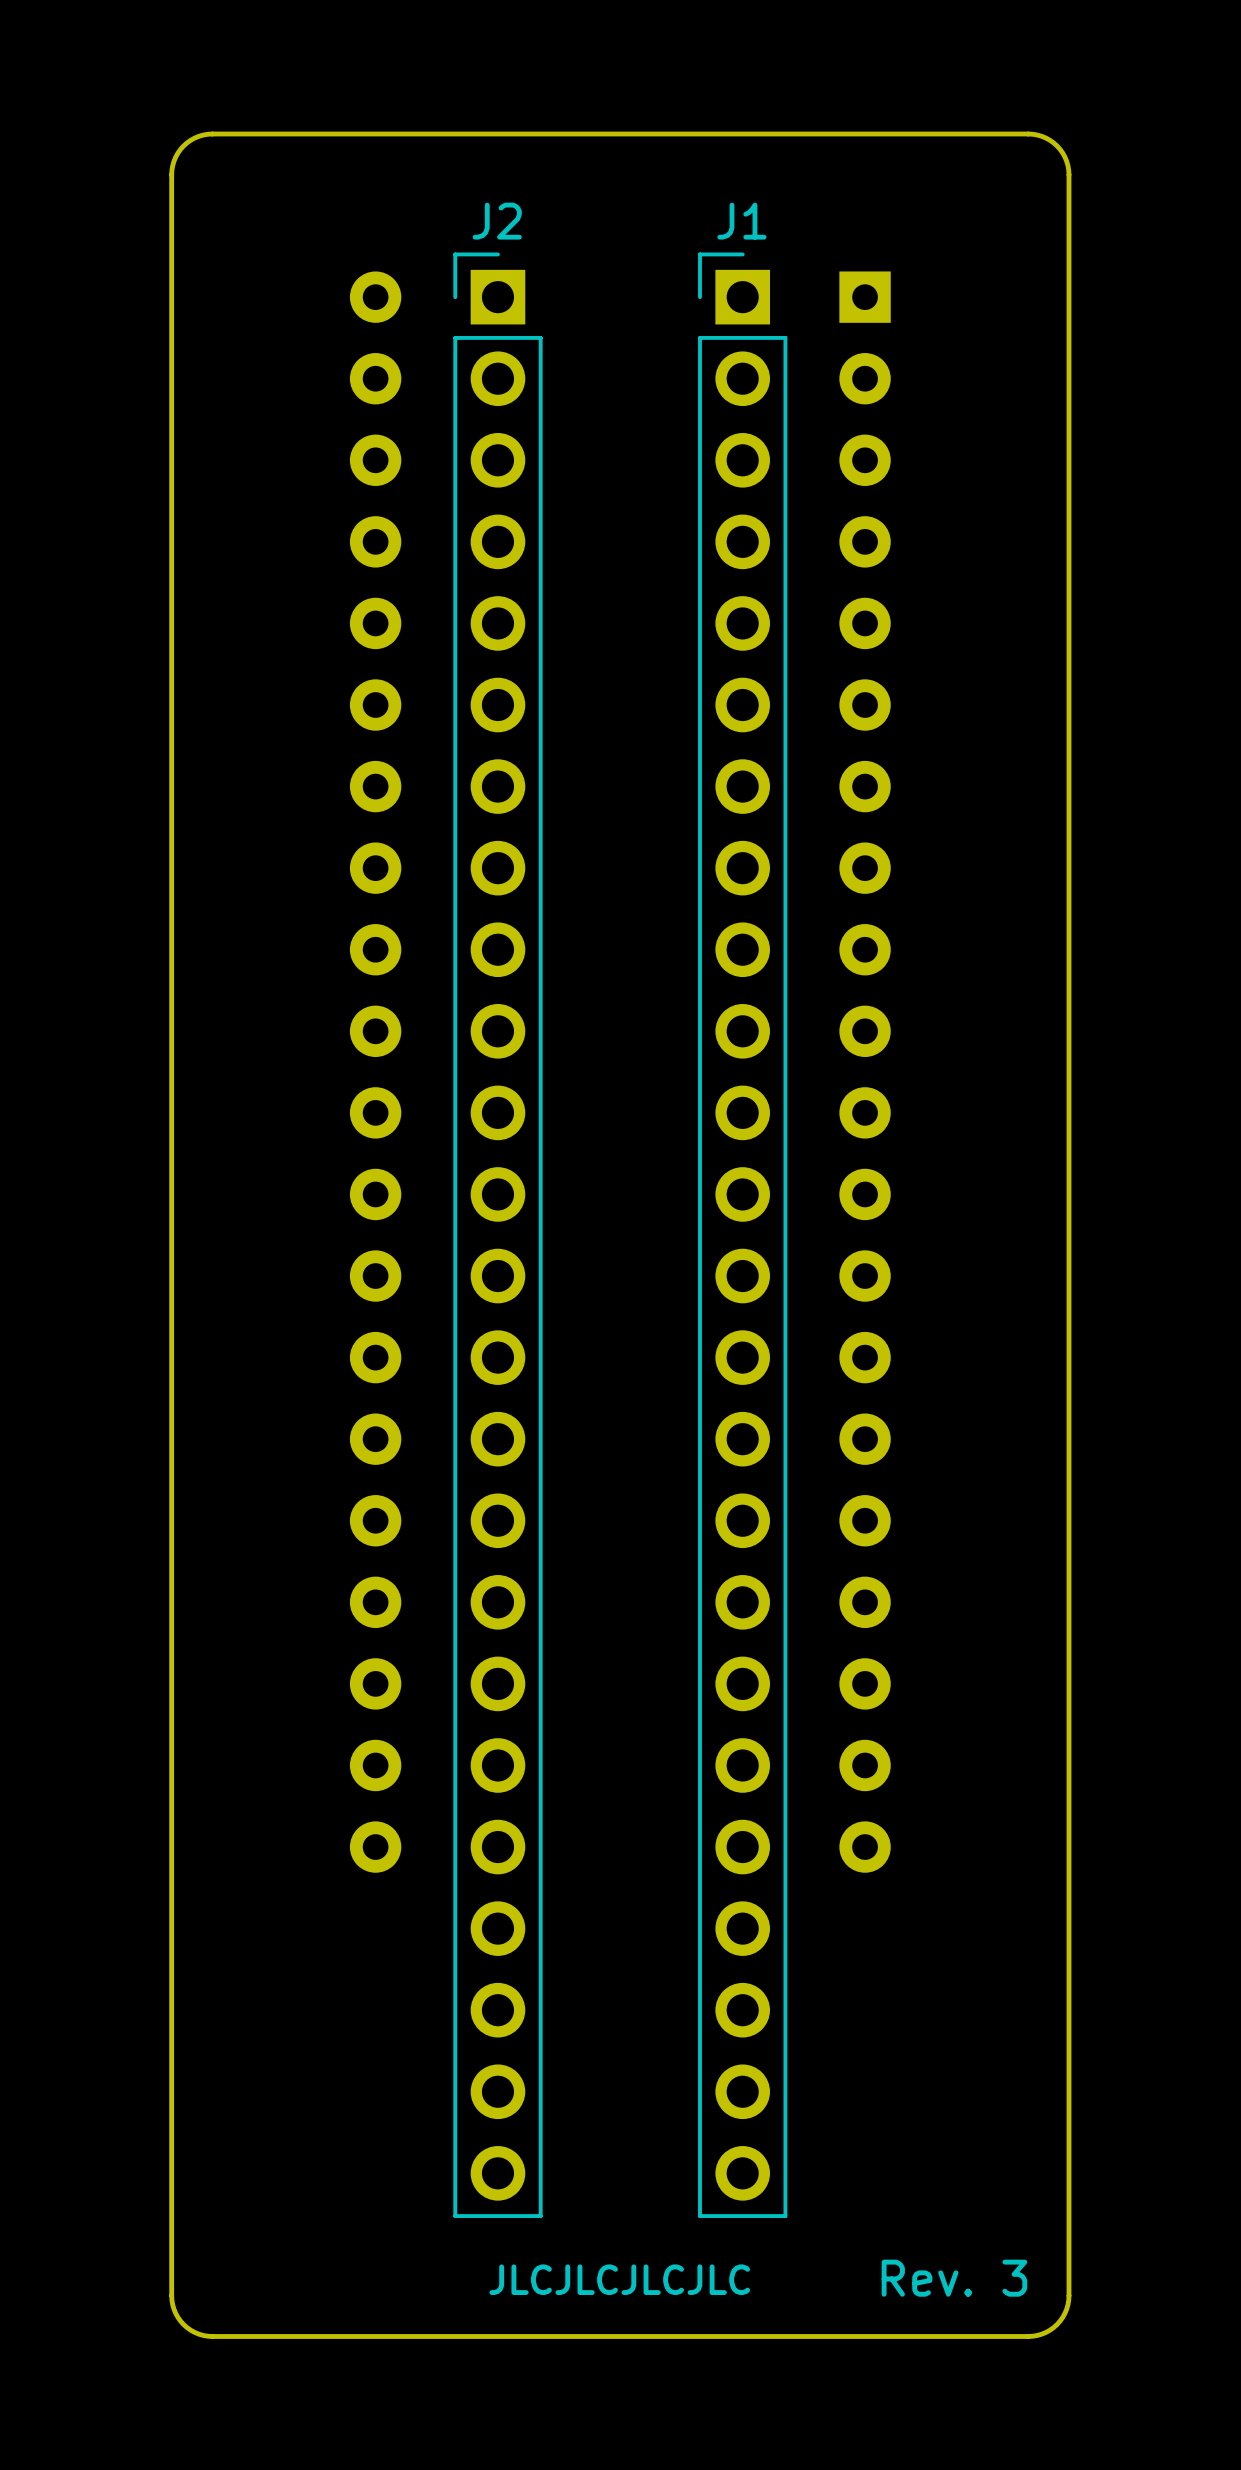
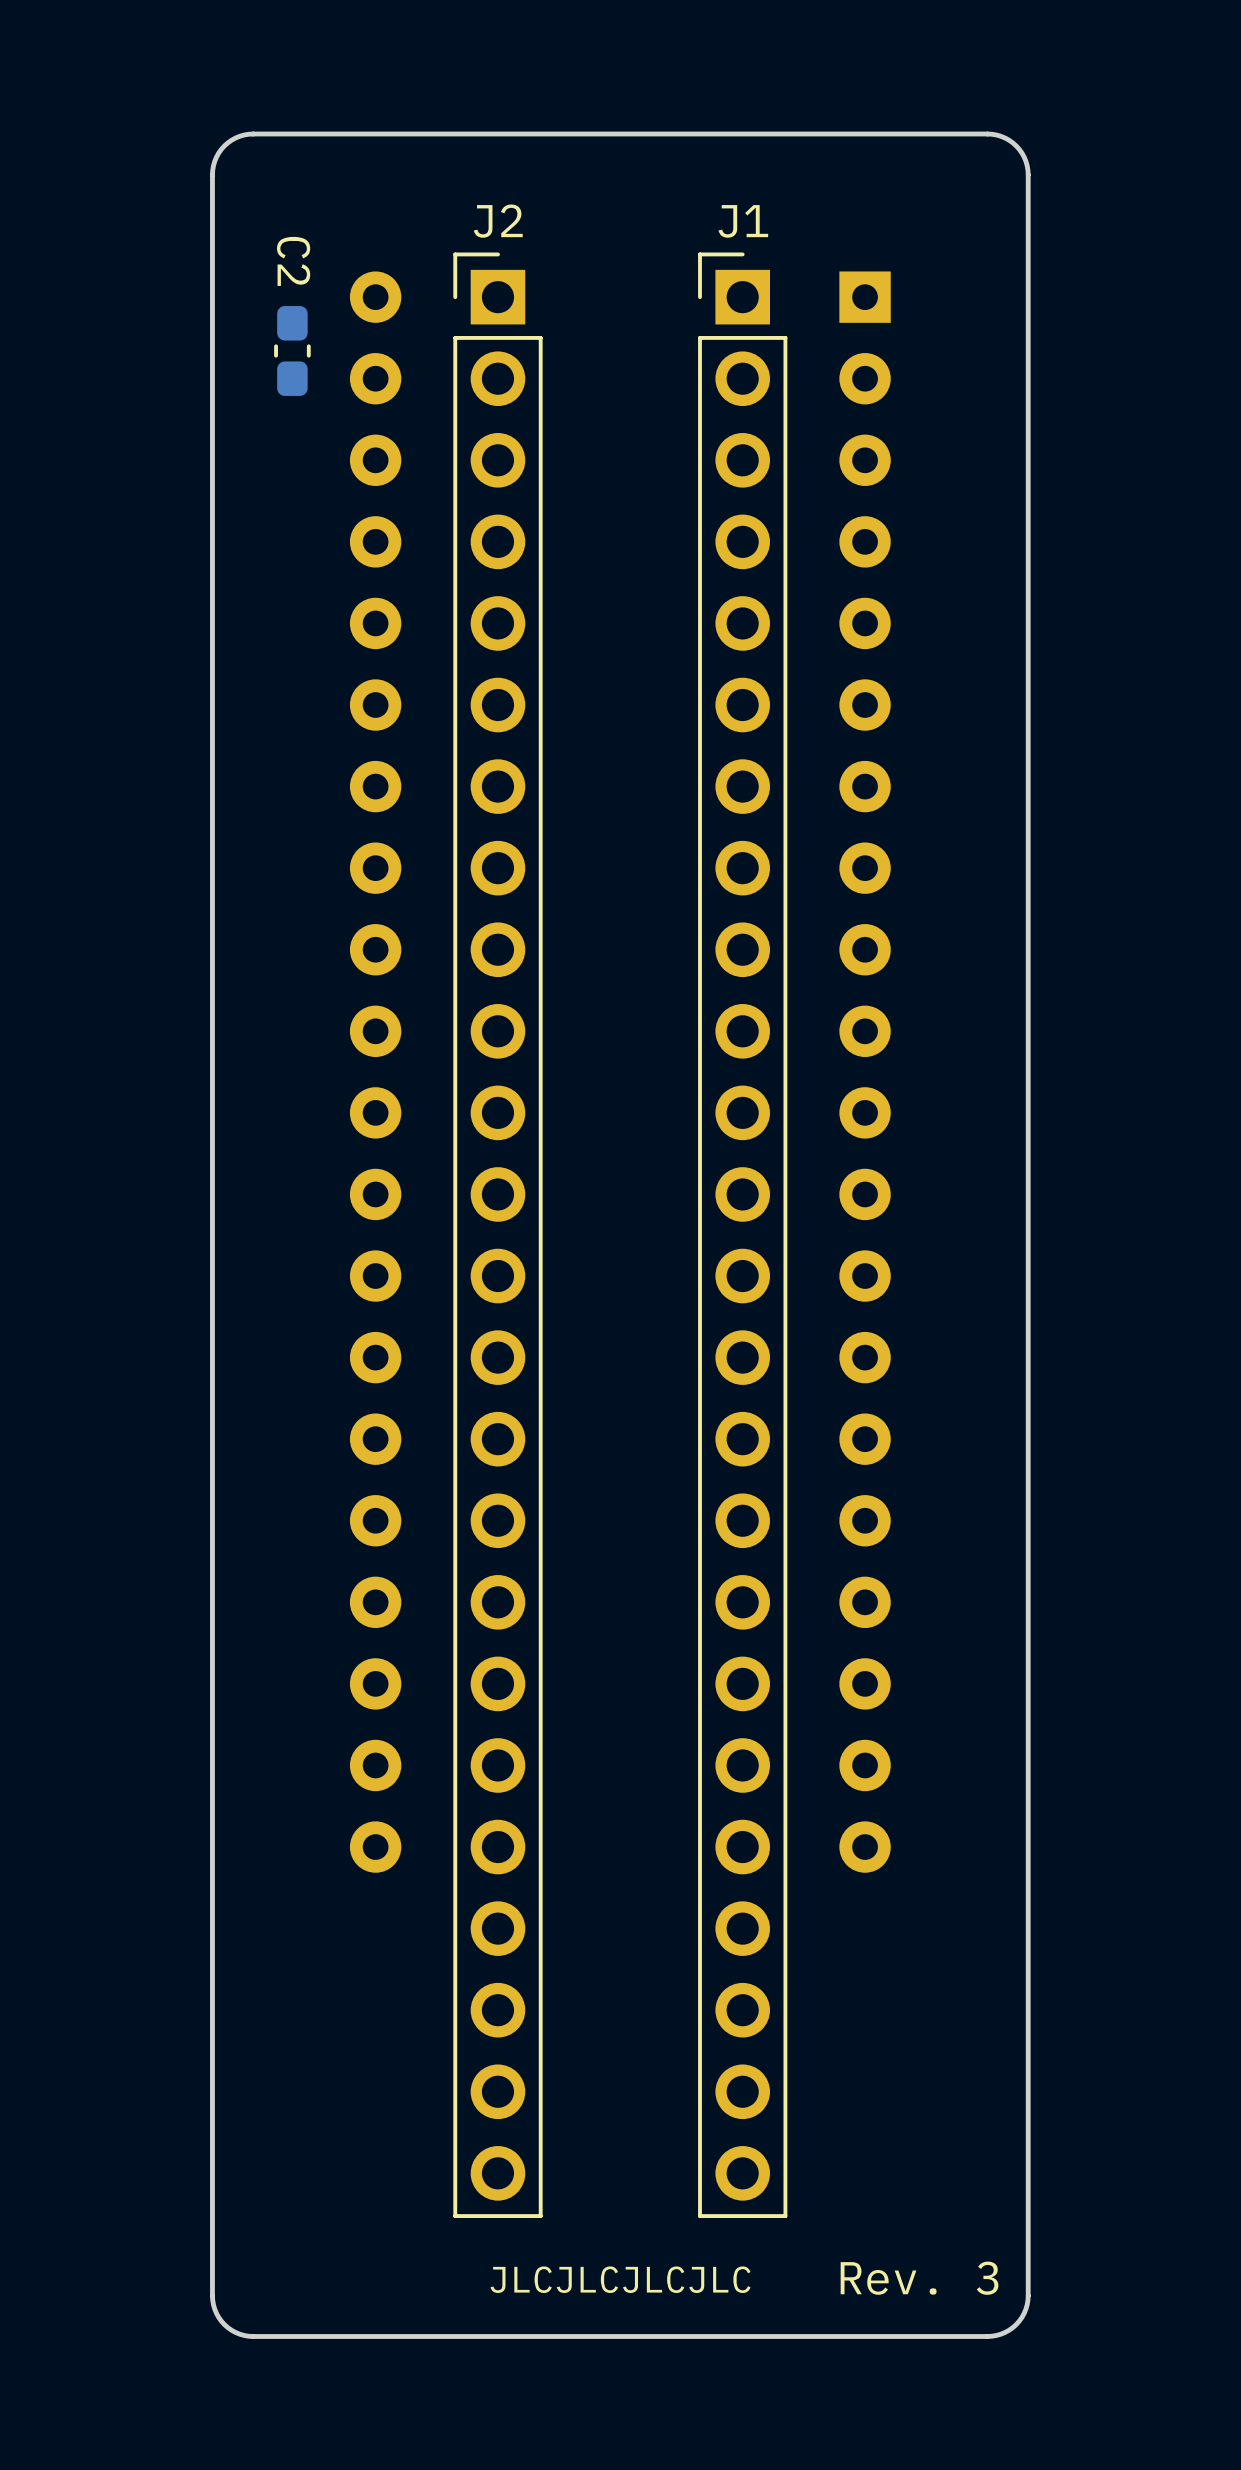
board edge: (253, 134) (207, 134) (194, 138) (187, 142) (177, 153) (172, 165) (171, 174) (171, 2295) (172, 2304) (177, 2317) (187, 2327) (194, 2332) (207, 2336) (253, 2336) -> (253, 134) (239, 136) (224, 145) (214, 161) (212, 174) (212, 2295) (214, 2309) (224, 2324) (239, 2334) (253, 2336)
board edge: (987, 134) (1032, 134) (1045, 138) (1053, 142) (1062, 153) (1067, 165) (1068, 174) (1068, 2295) (1067, 2304) (1062, 2317) (1057, 2324) (1045, 2332) (1032, 2336) (987, 2336) -> (987, 134) (1000, 136) (1016, 145) (1025, 161) (1028, 174) (1028, 2295) (1025, 2309) (1016, 2324) (1000, 2334) (987, 2336)
C2: none -> (292, 350)
text position: Rev. 3 (954, 2278) -> Rev. 3 (919, 2278)

